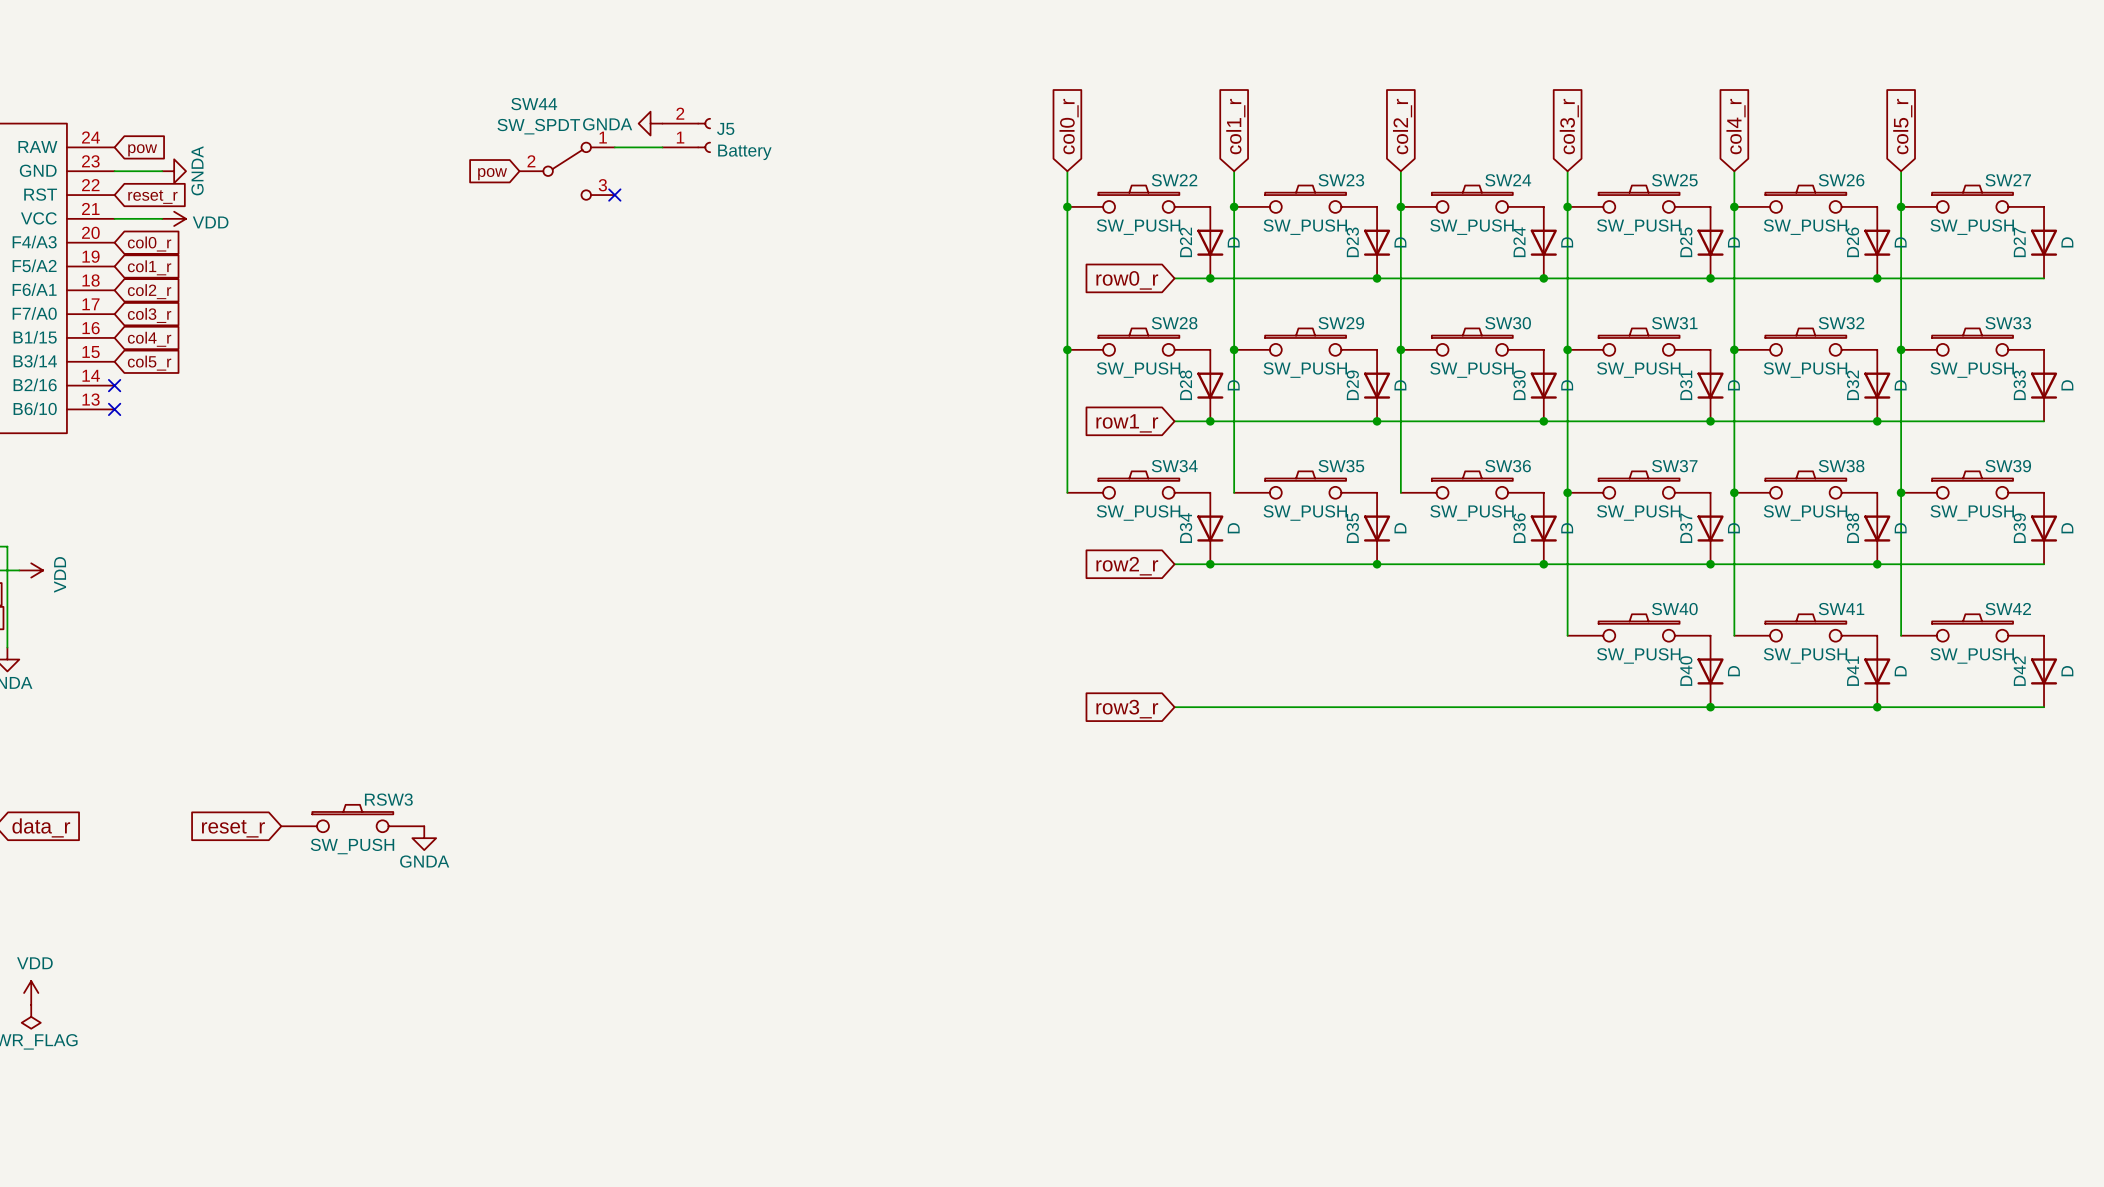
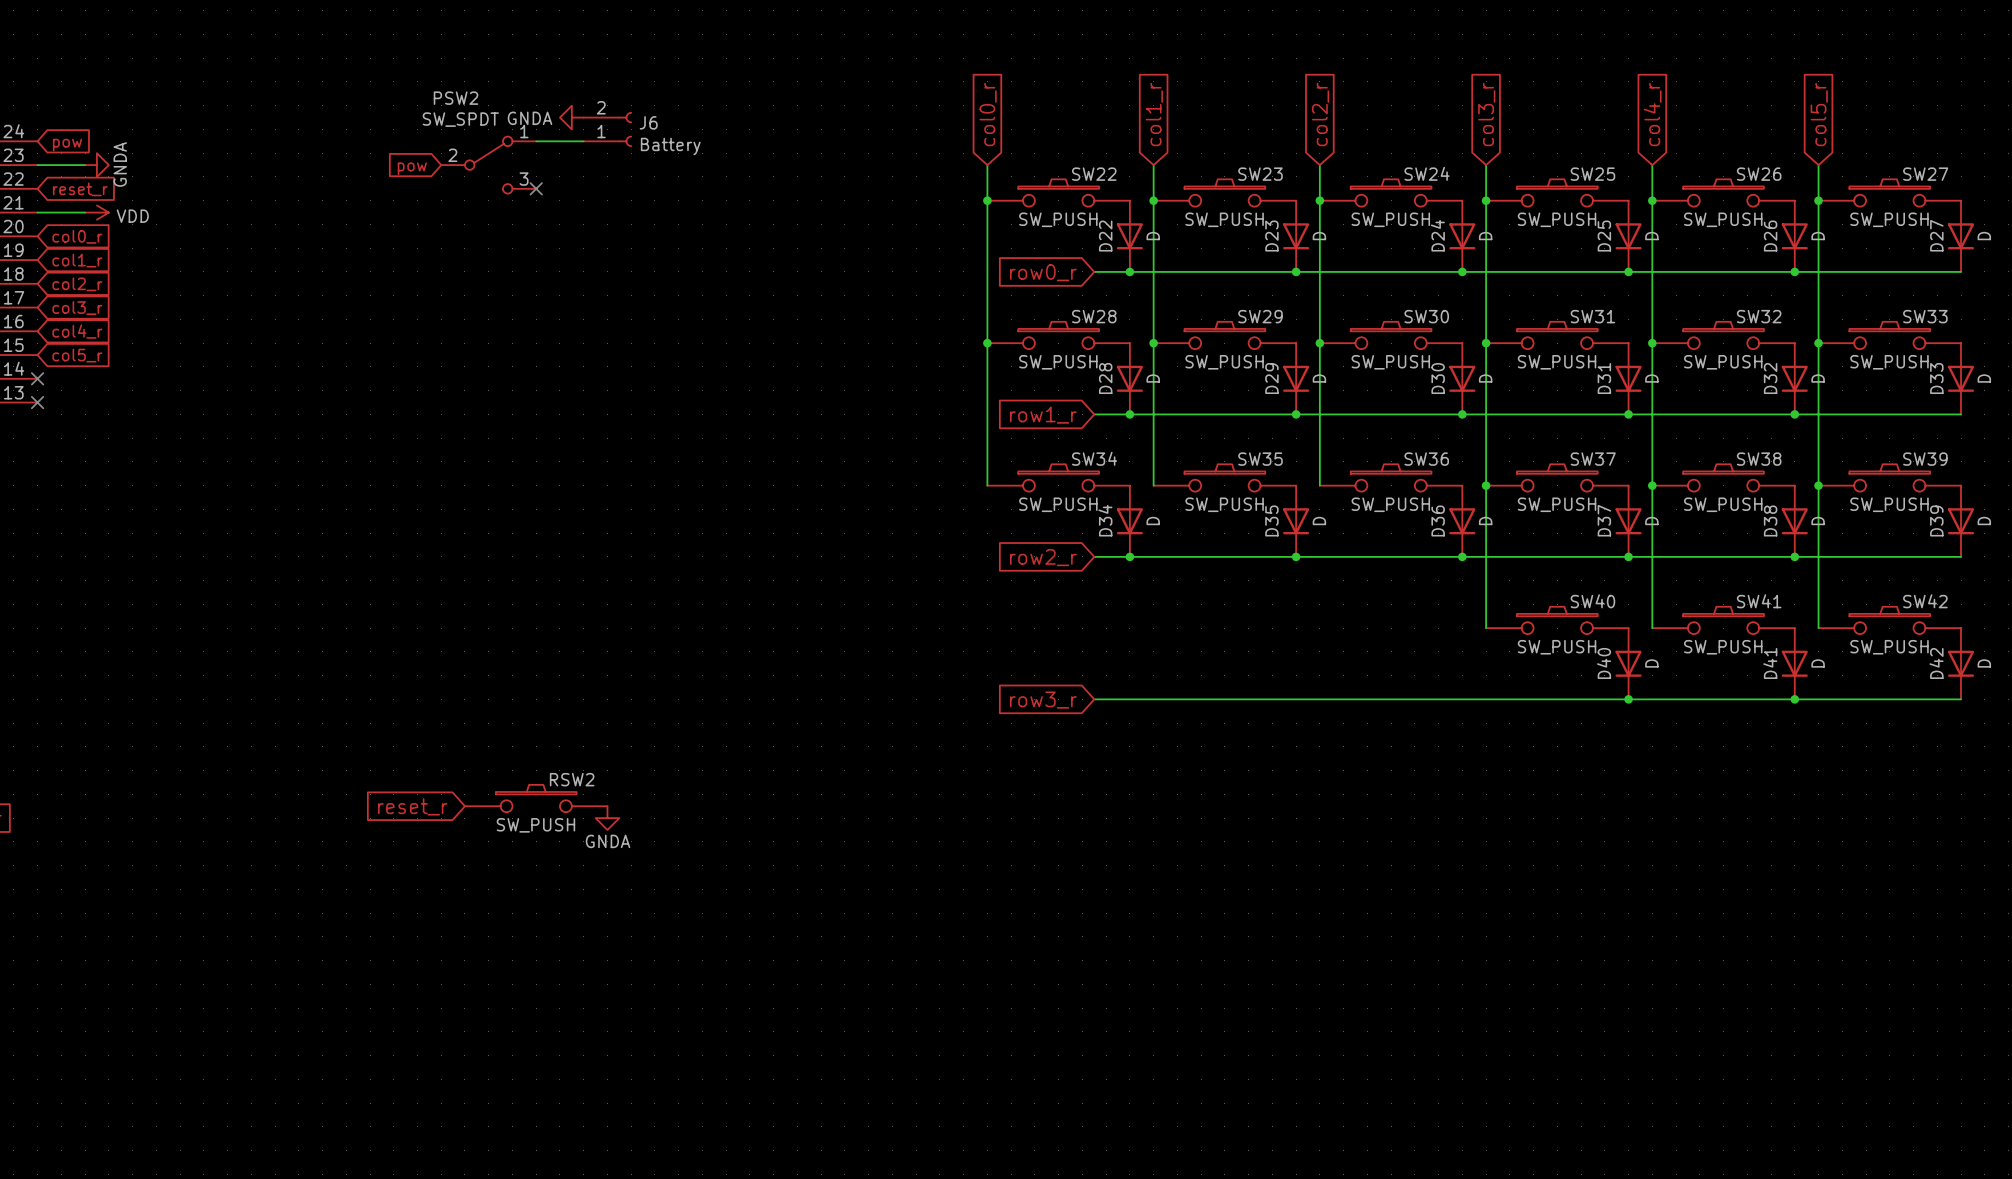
SW44 name: SW44 (534, 104) -> PSW2 (456, 98)
J5 name: J5 (725, 128) -> J6 (648, 122)
RSW2: none -> SW_PUSH (536, 798)
global label: none -> reset_r (412, 806)
RSW3: SW_PUSH (352, 818) -> none
power symbol: none -> GNDA (607, 818)
global label: reset_r (233, 828) -> none
power symbol: GNDA (424, 838) -> none

